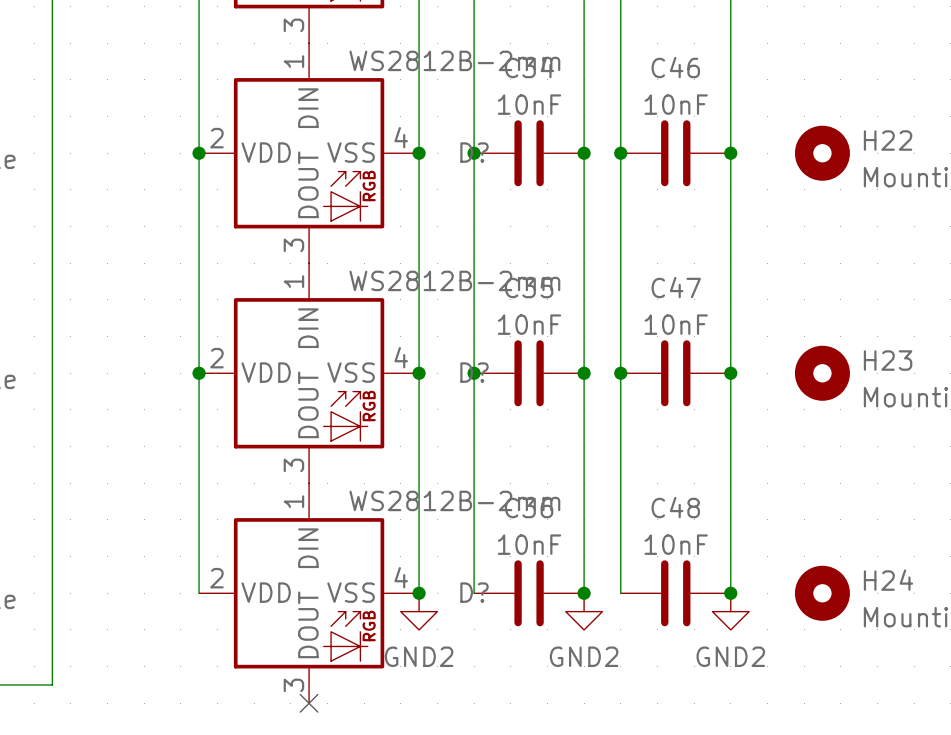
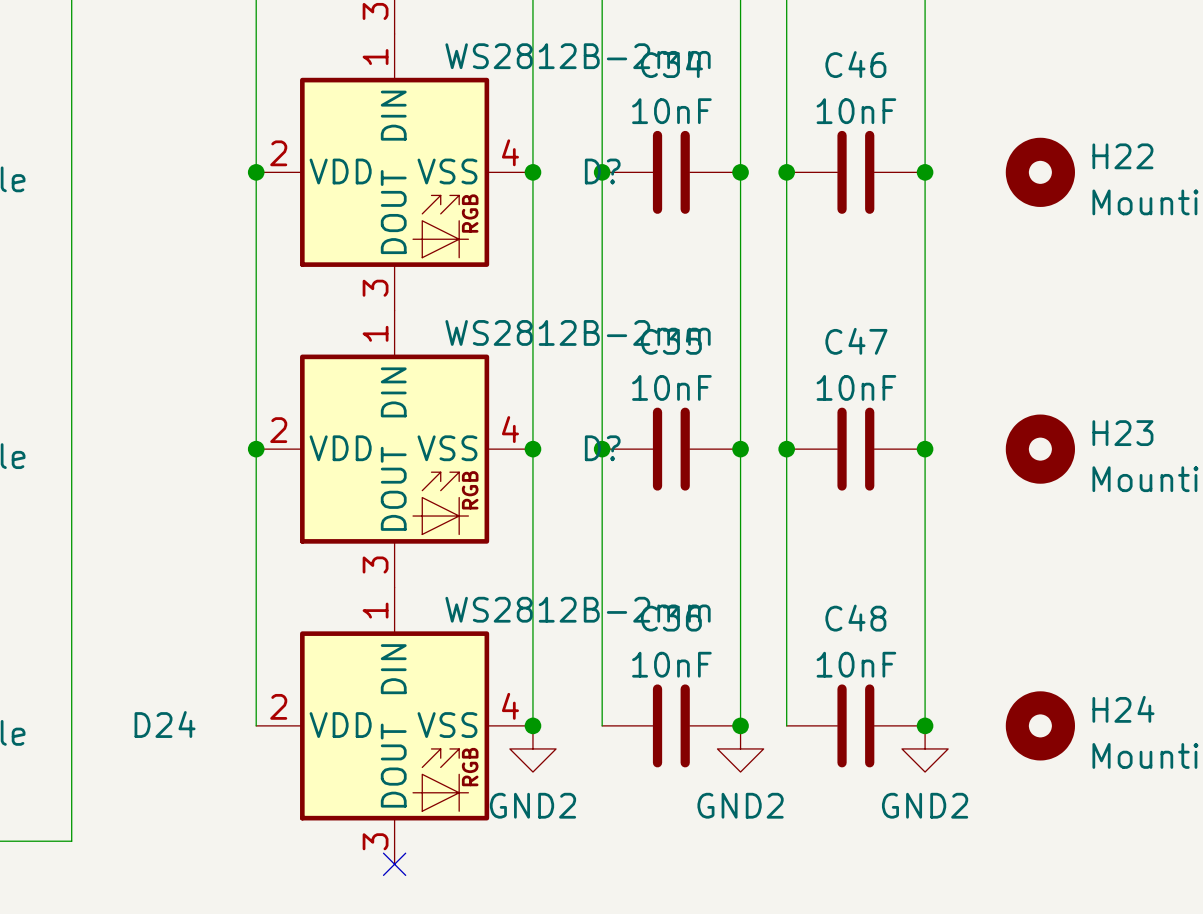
D? name: D? (474, 592) -> D24 (165, 724)

